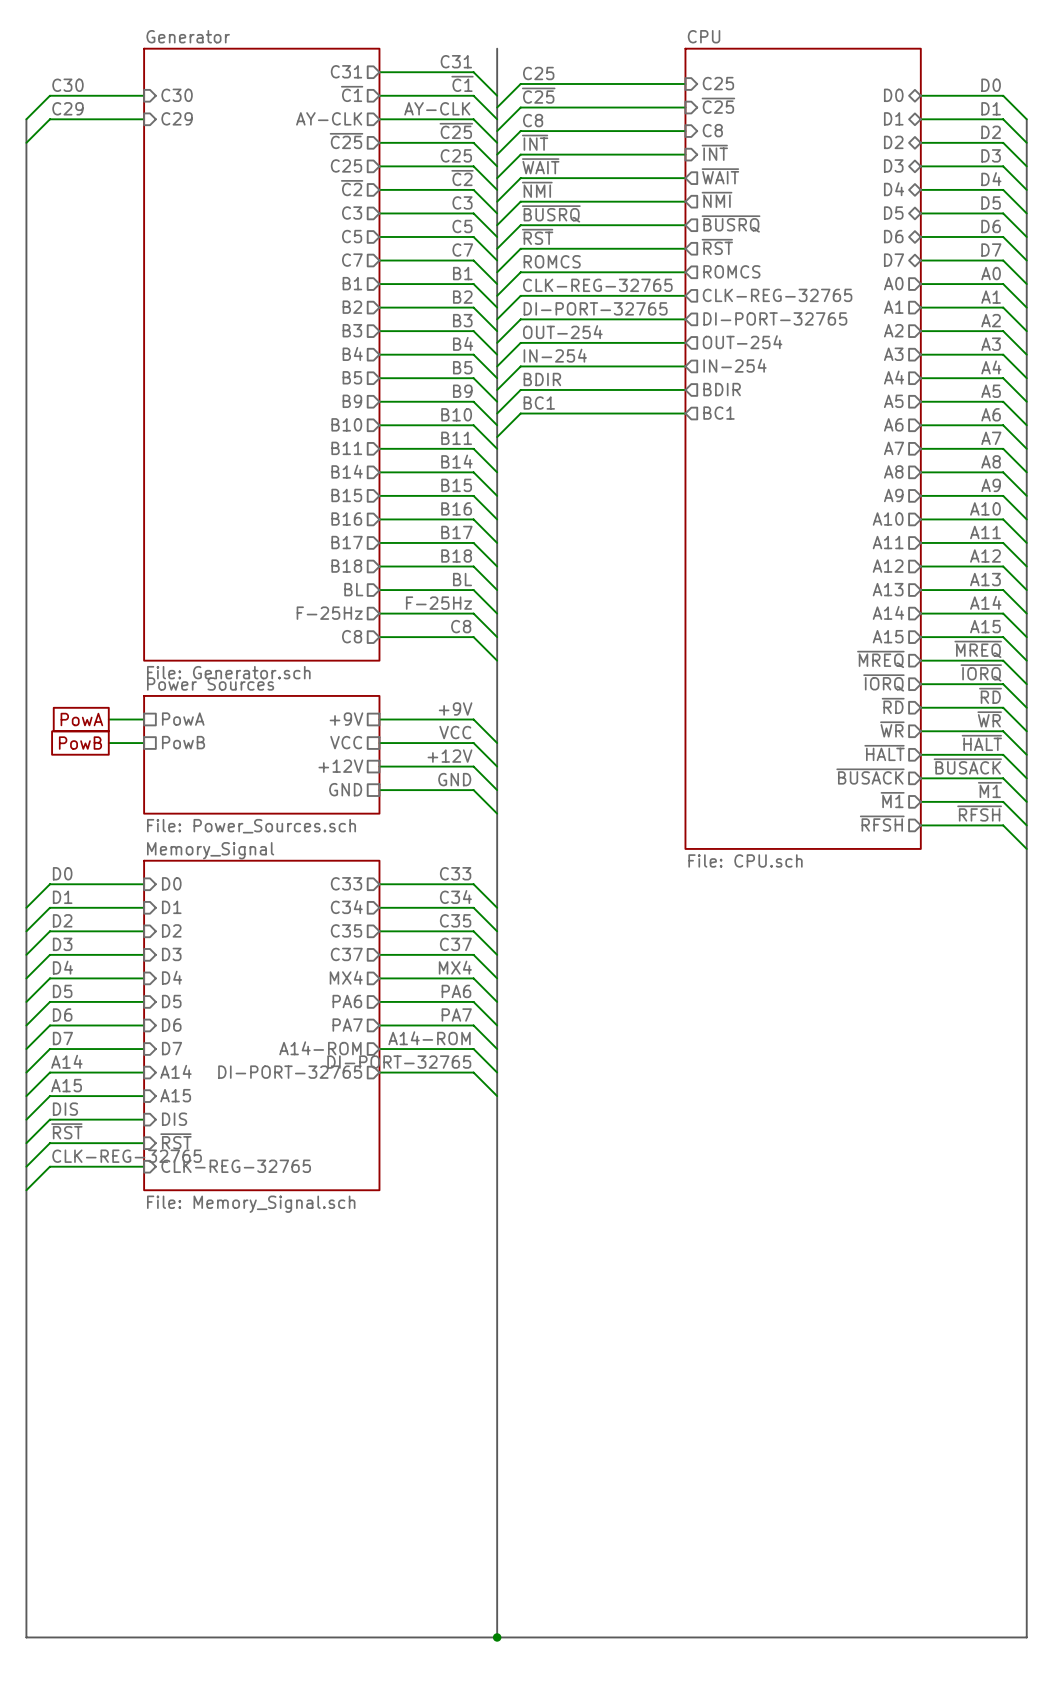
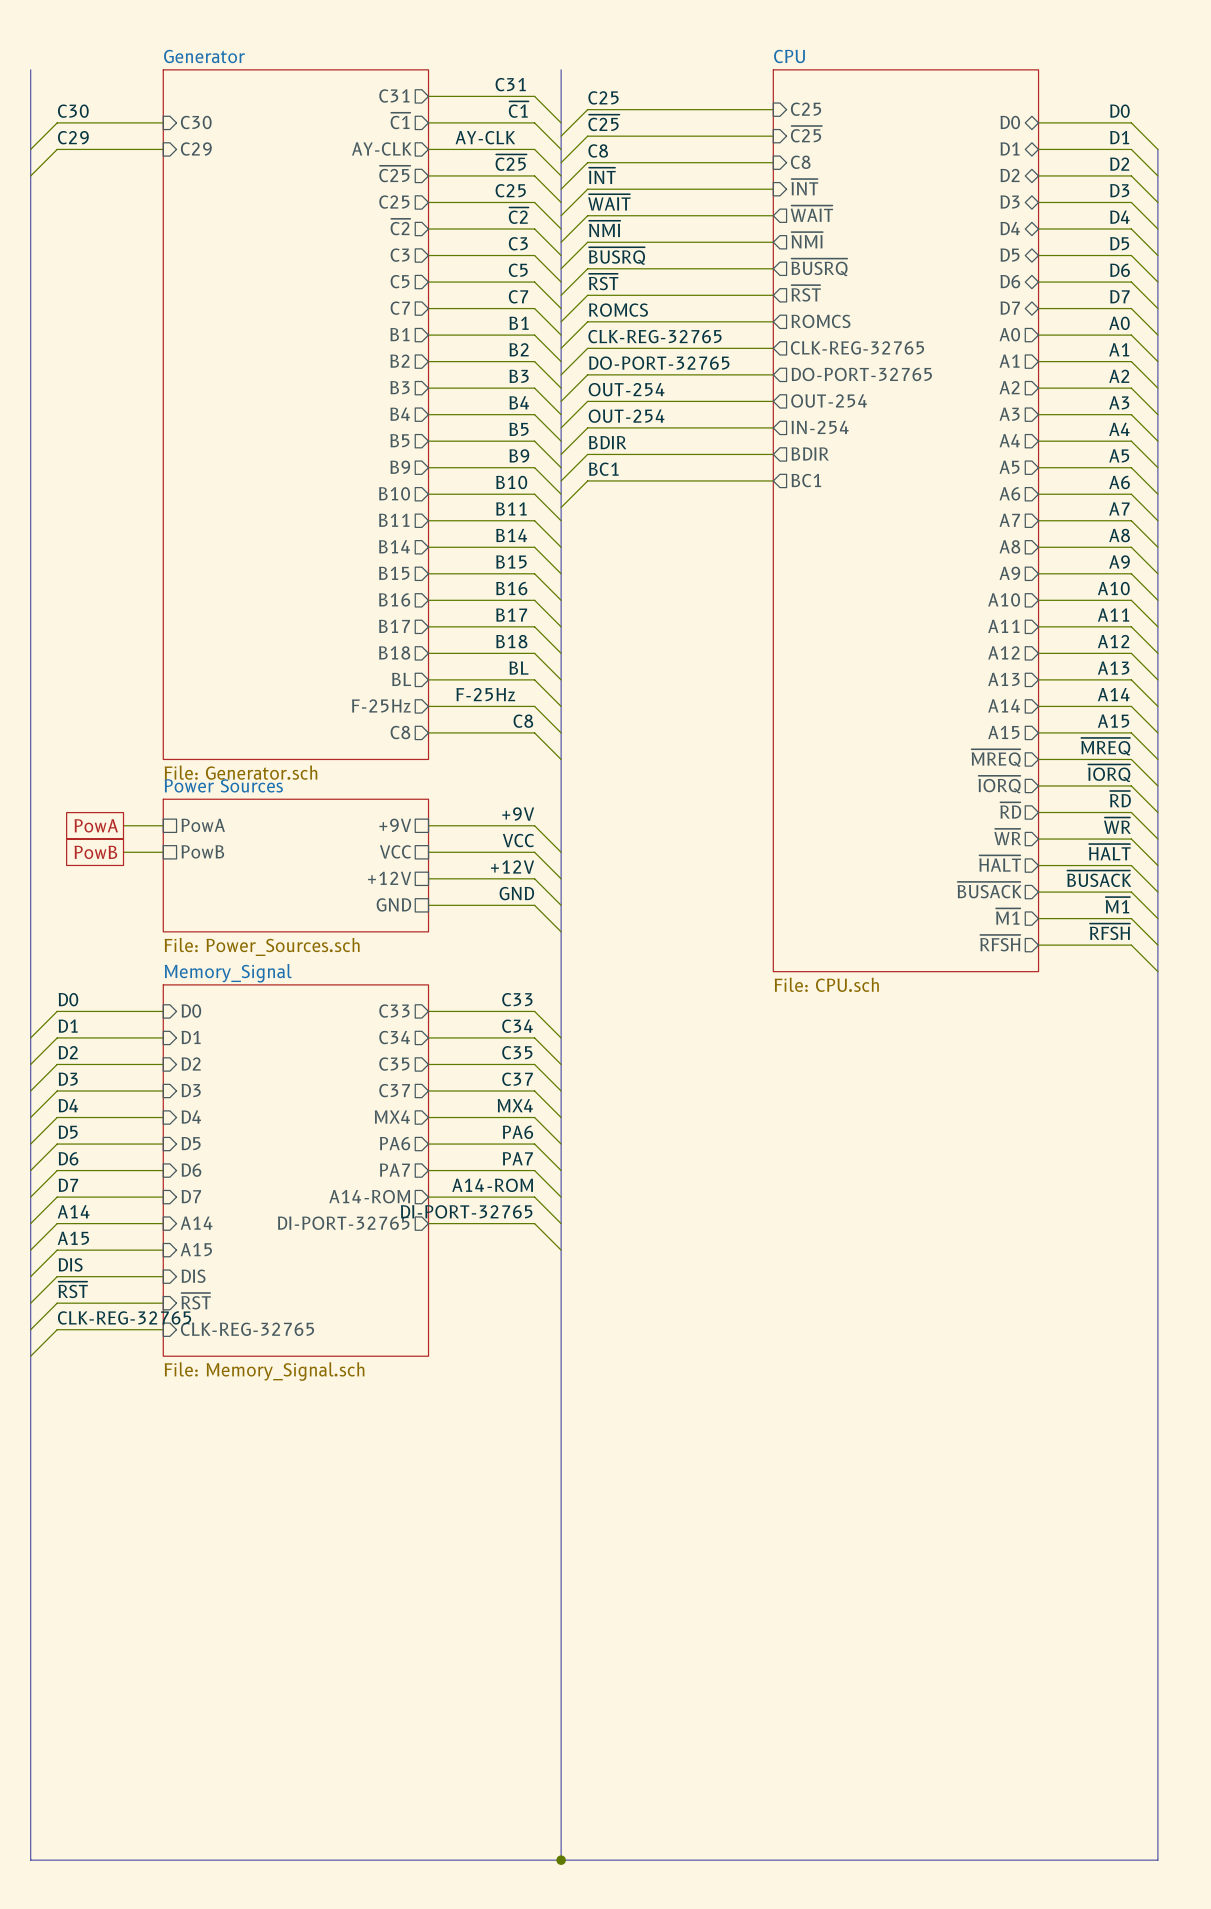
bus: none -> (30, 69) (30, 149)
label: DI-PORT-32765 (595, 308) -> DO-PORT-32765 (659, 363)
sheet pin: DI-PORT-32765 (775, 318) -> DO-PORT-32765 (861, 374)
label: IN-254 (555, 355) -> OUT-254 (626, 416)

